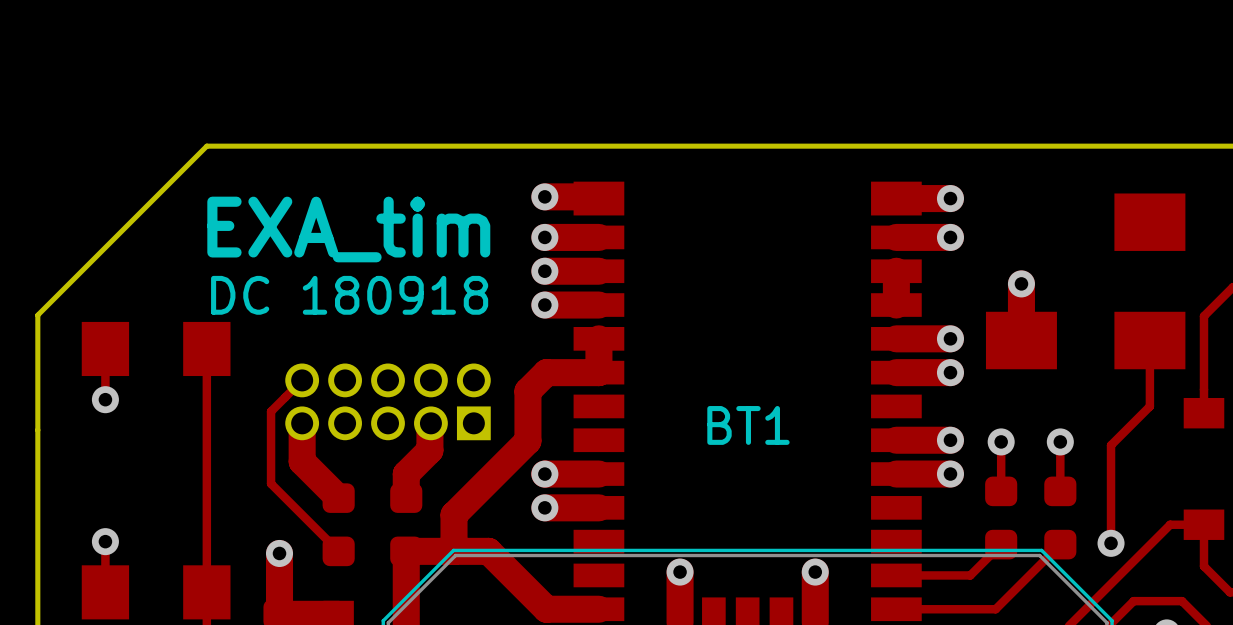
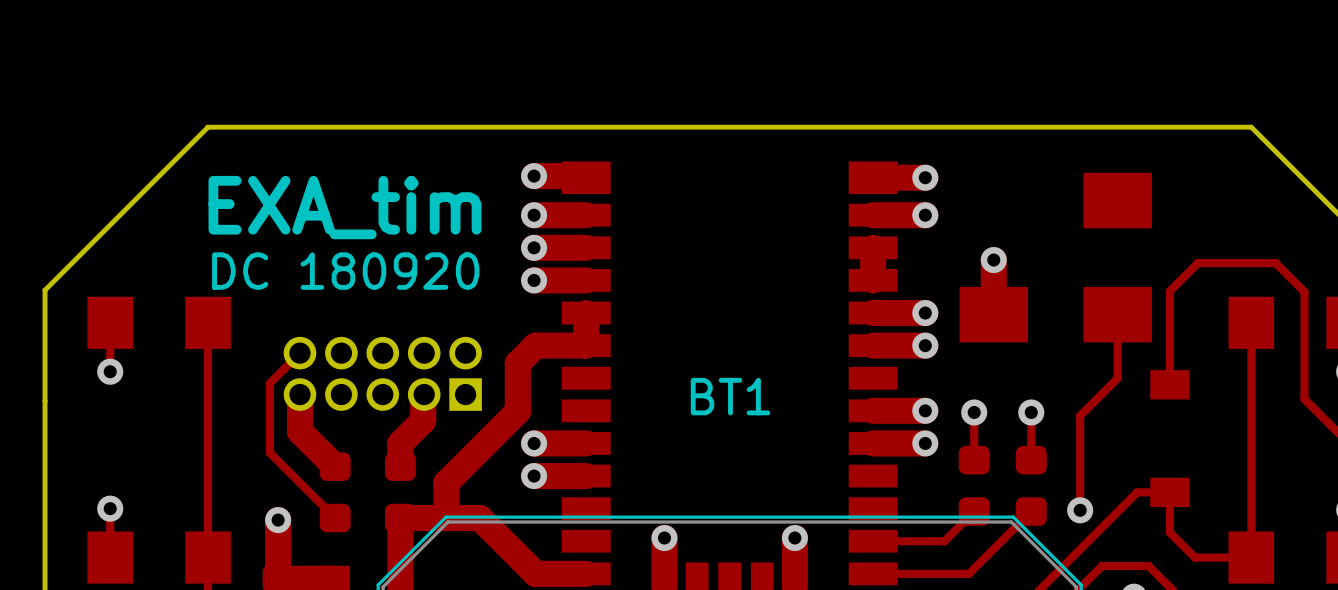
text: DC 180918 (349, 295) -> DC 180920 (345, 271)

